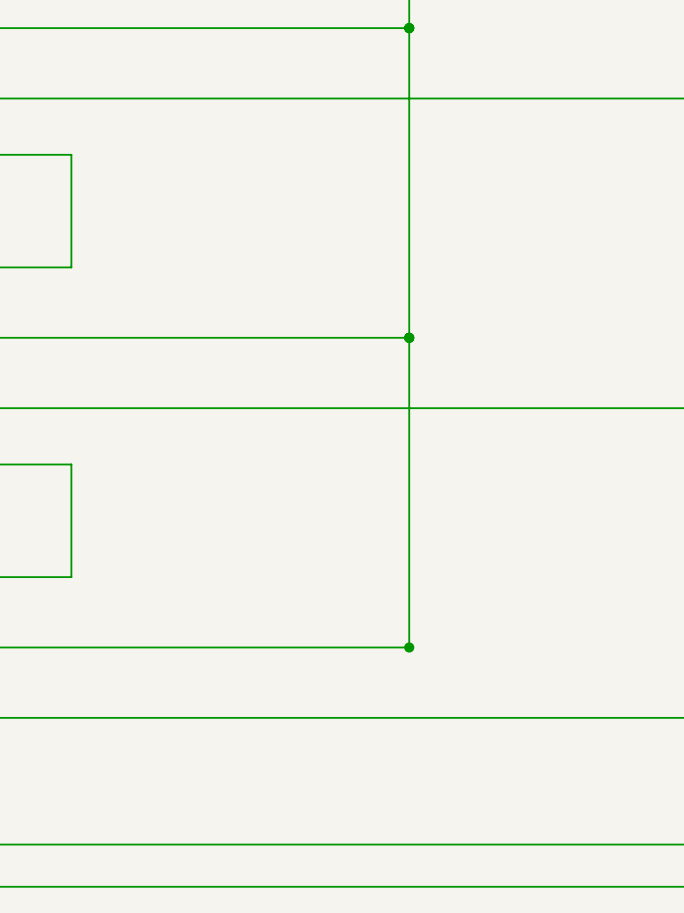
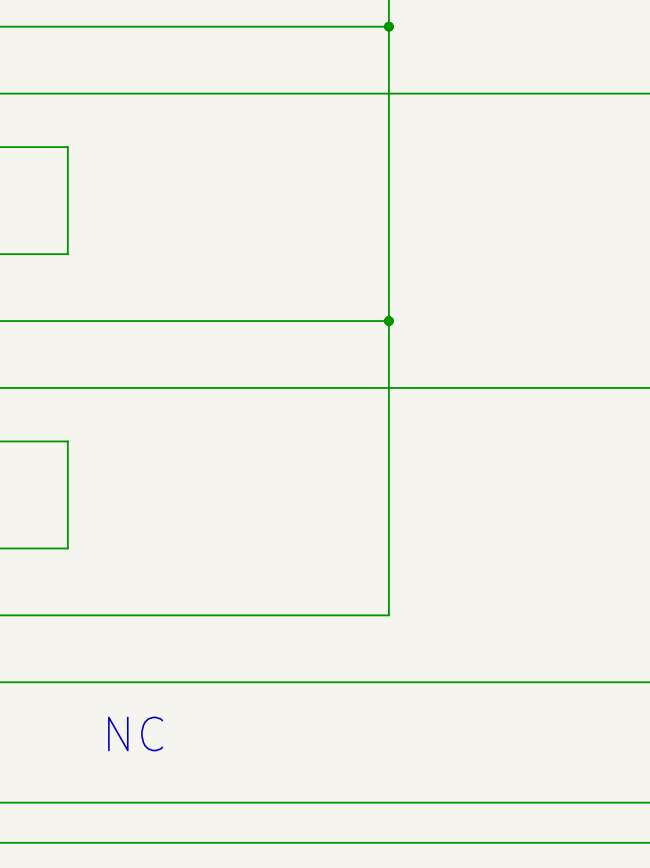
junction: (409, 647) -> none
text: none -> NC (135, 733)

